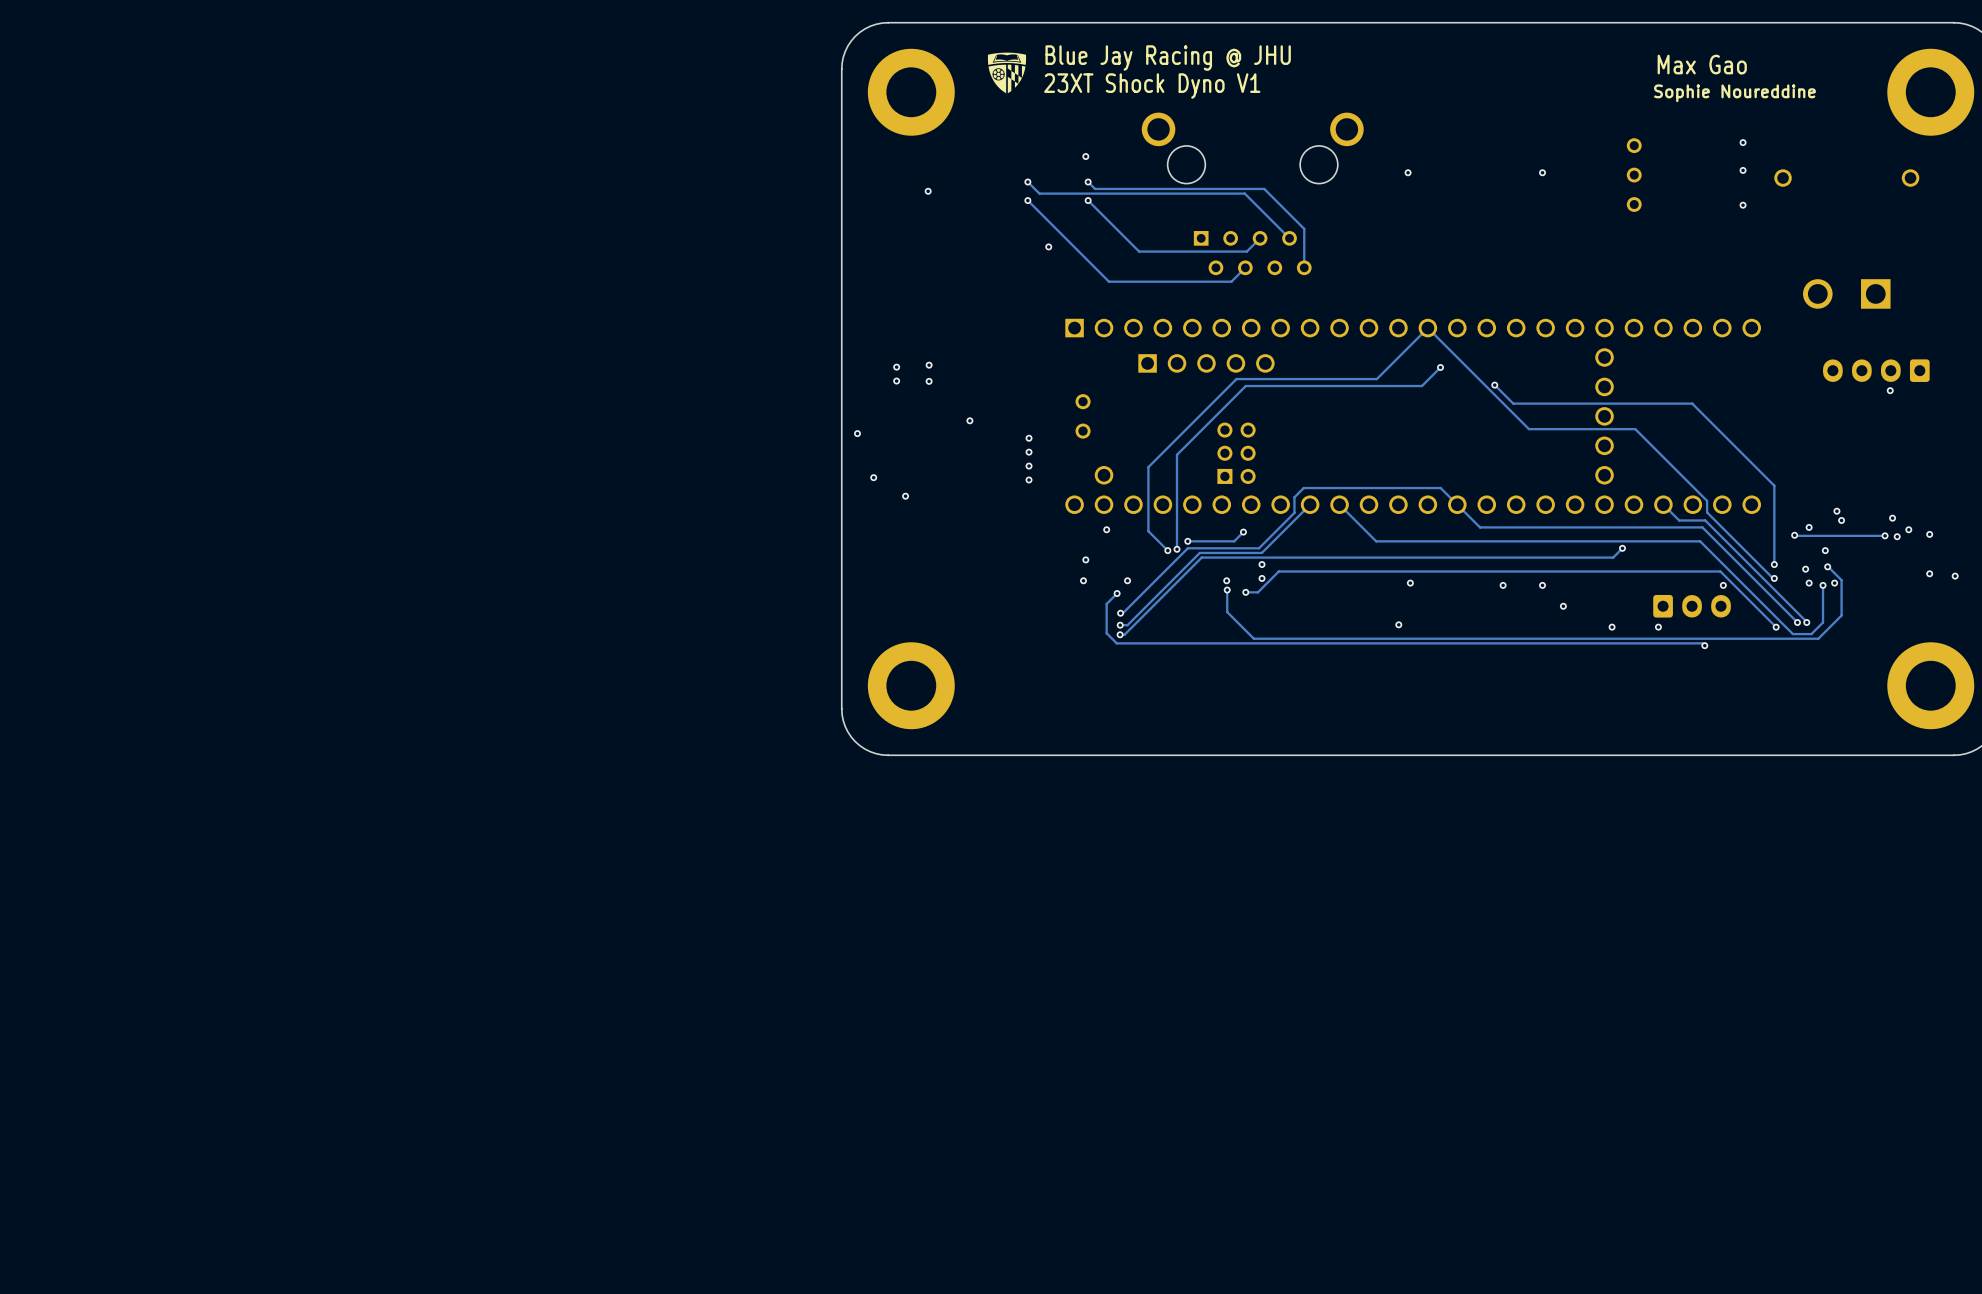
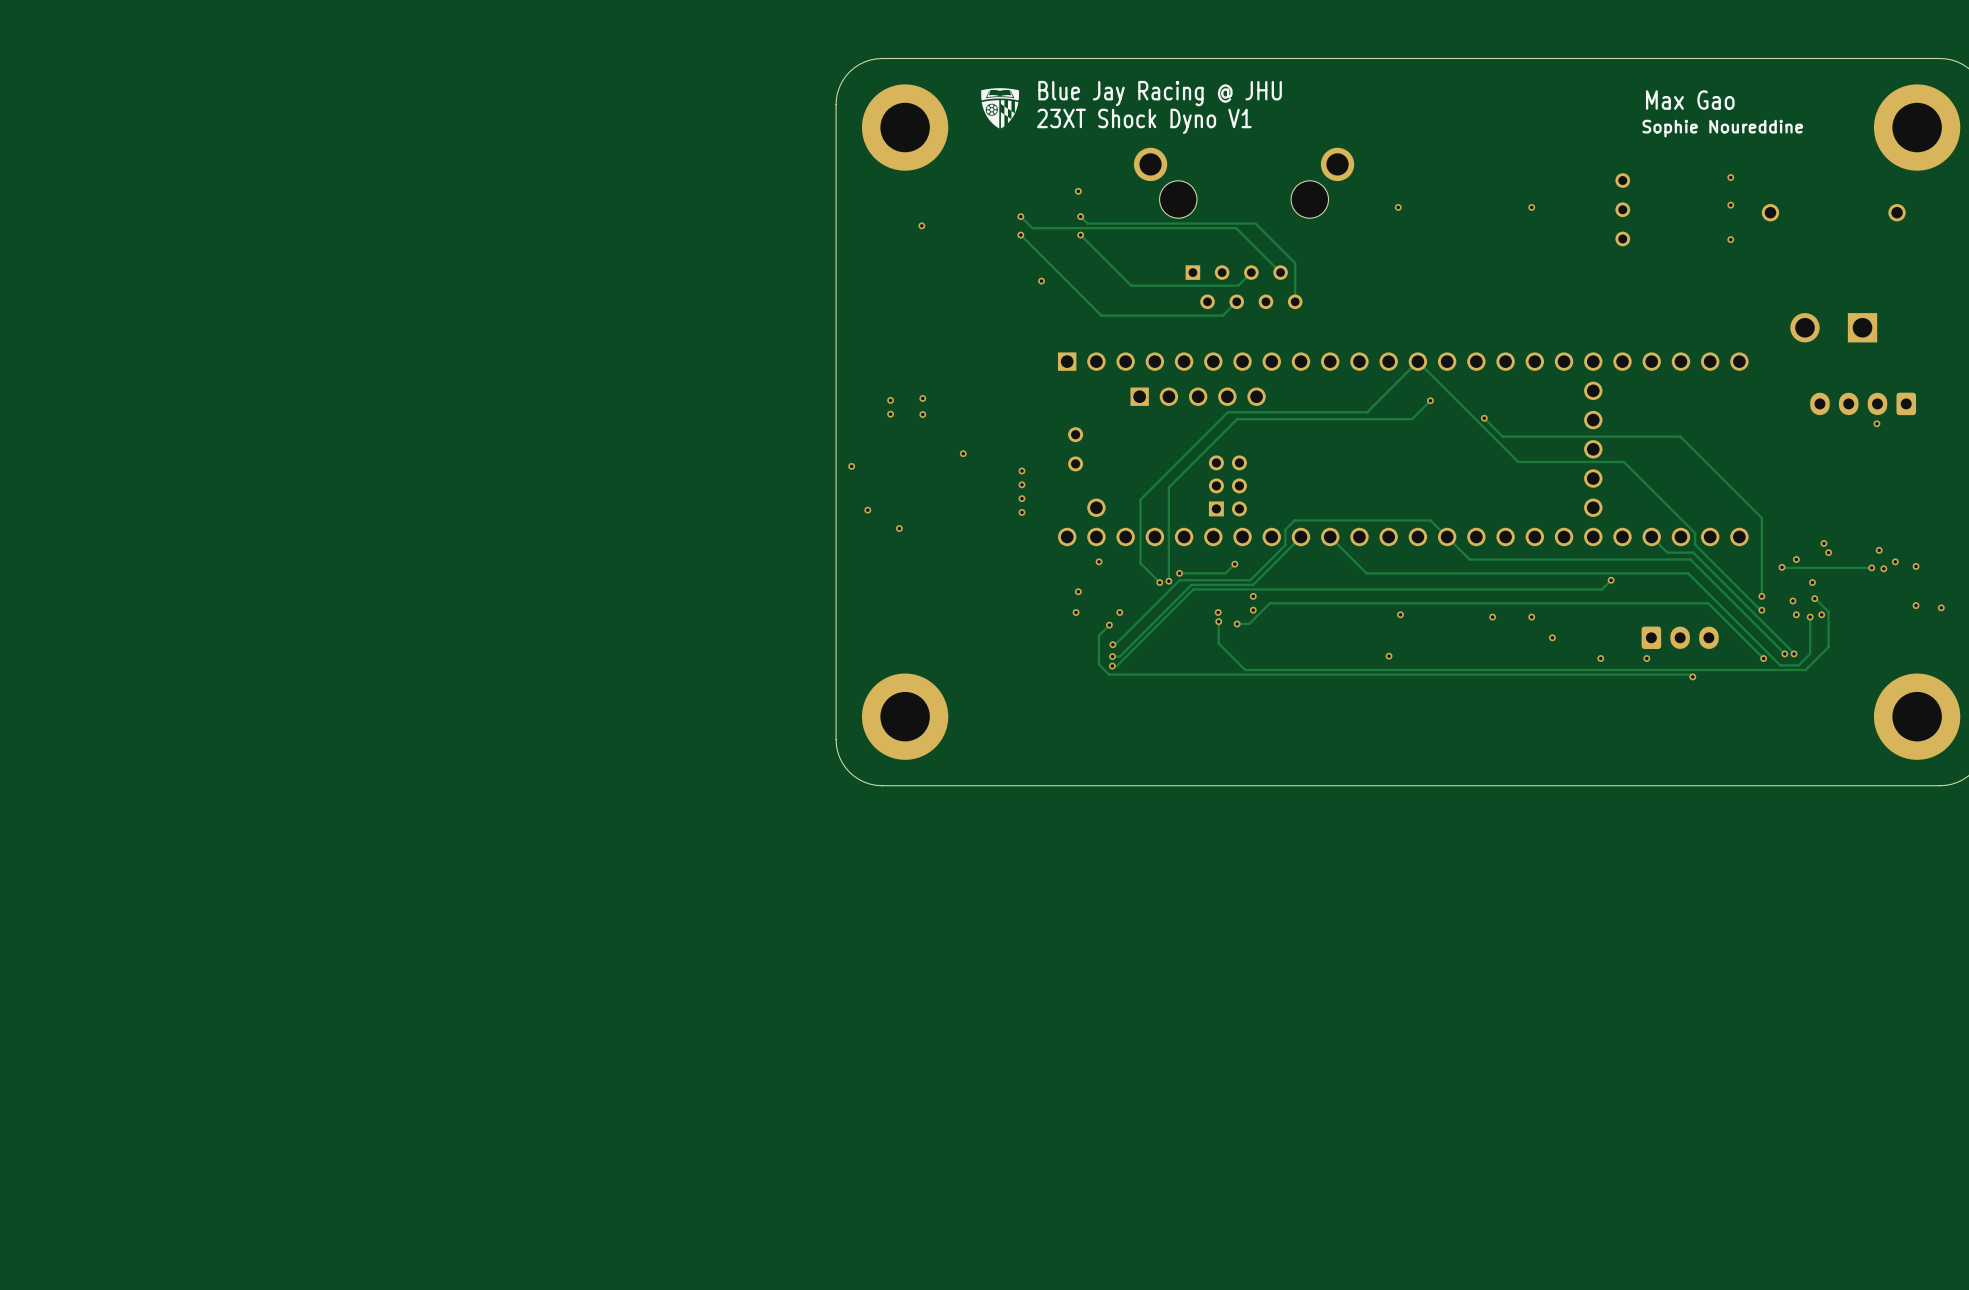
via: (1723, 585) -> none

